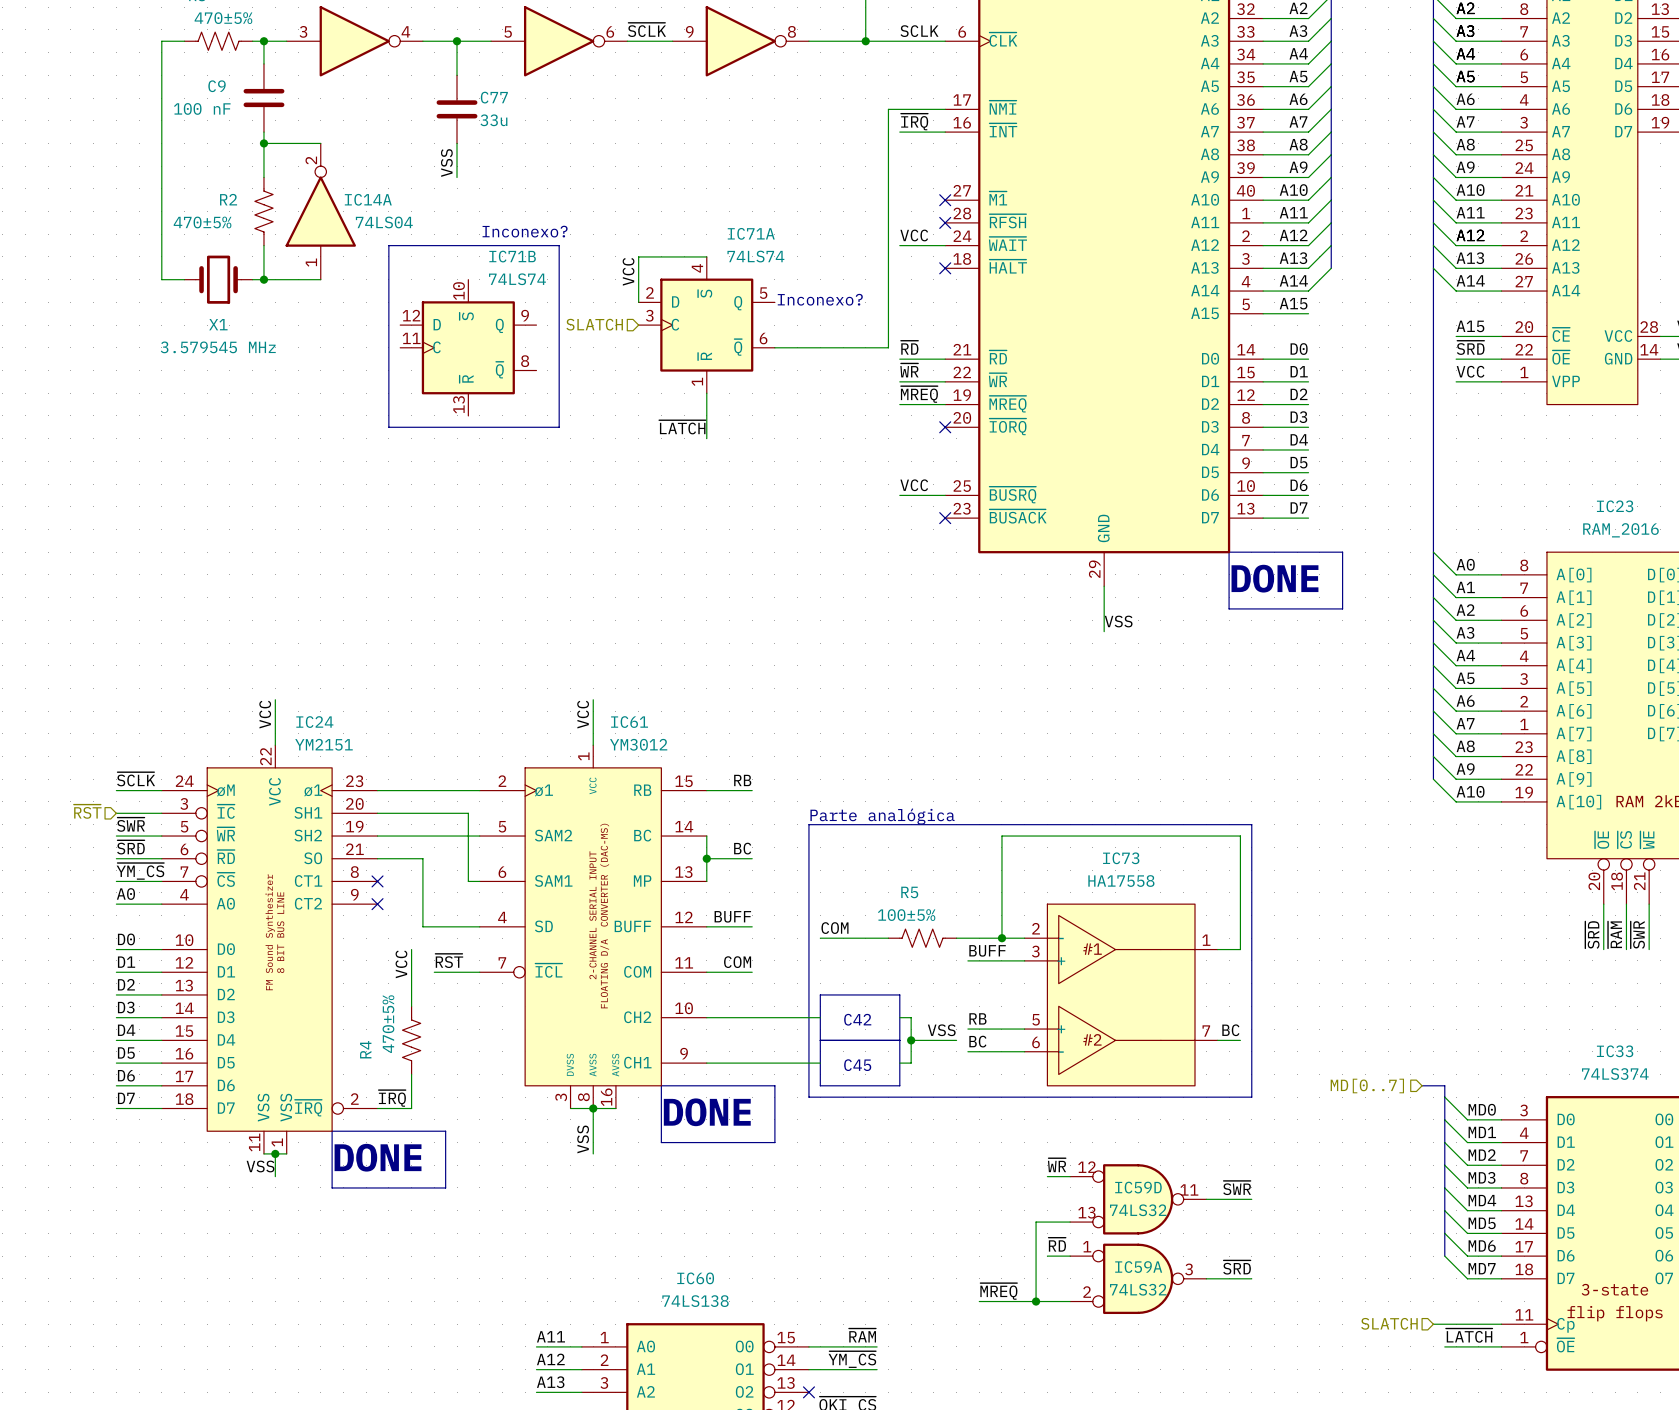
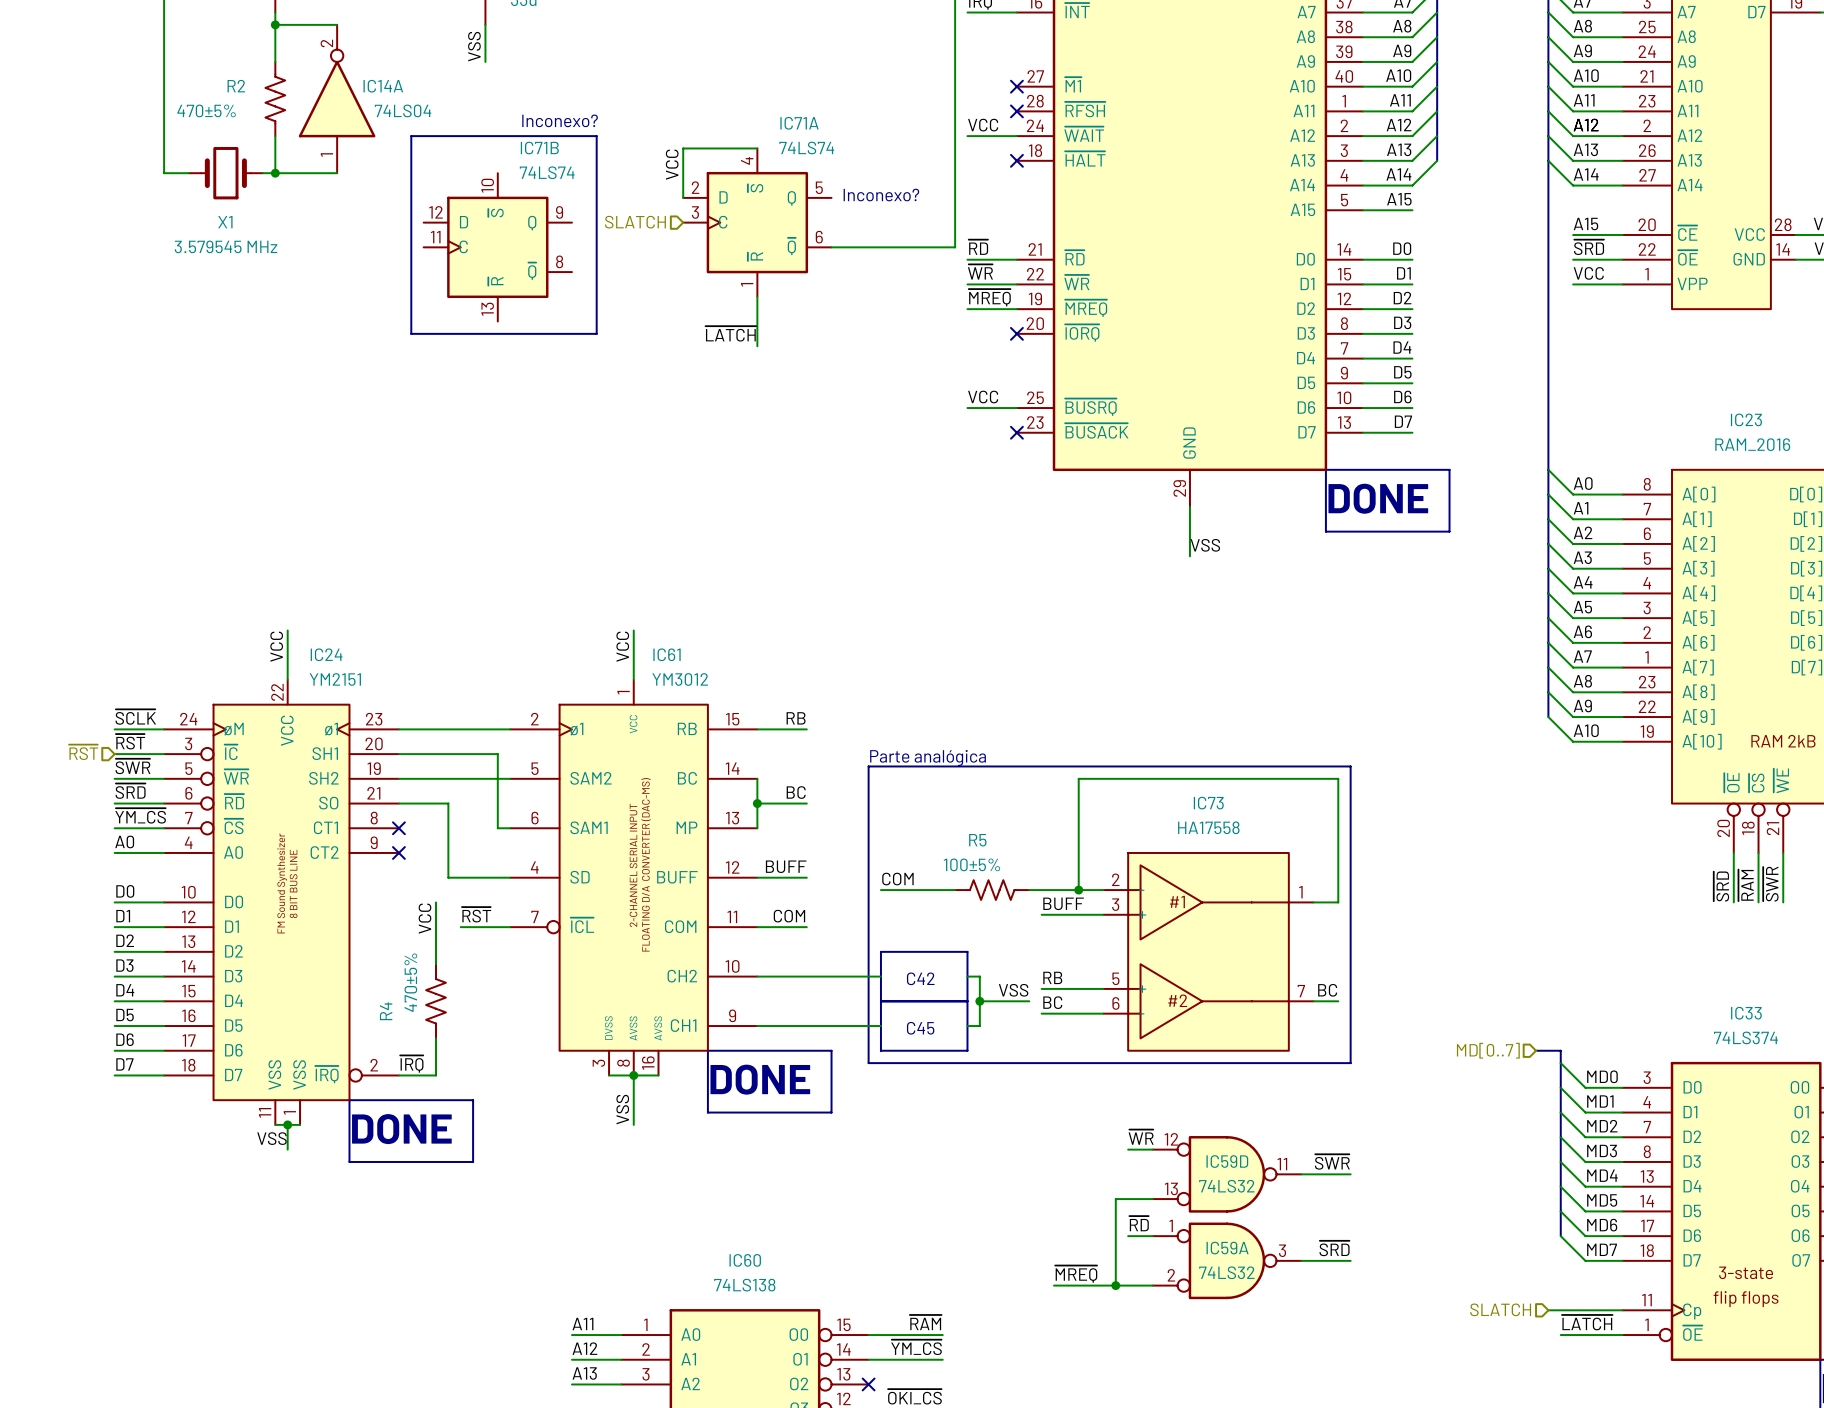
label: none -> ~{RST} (130, 741)

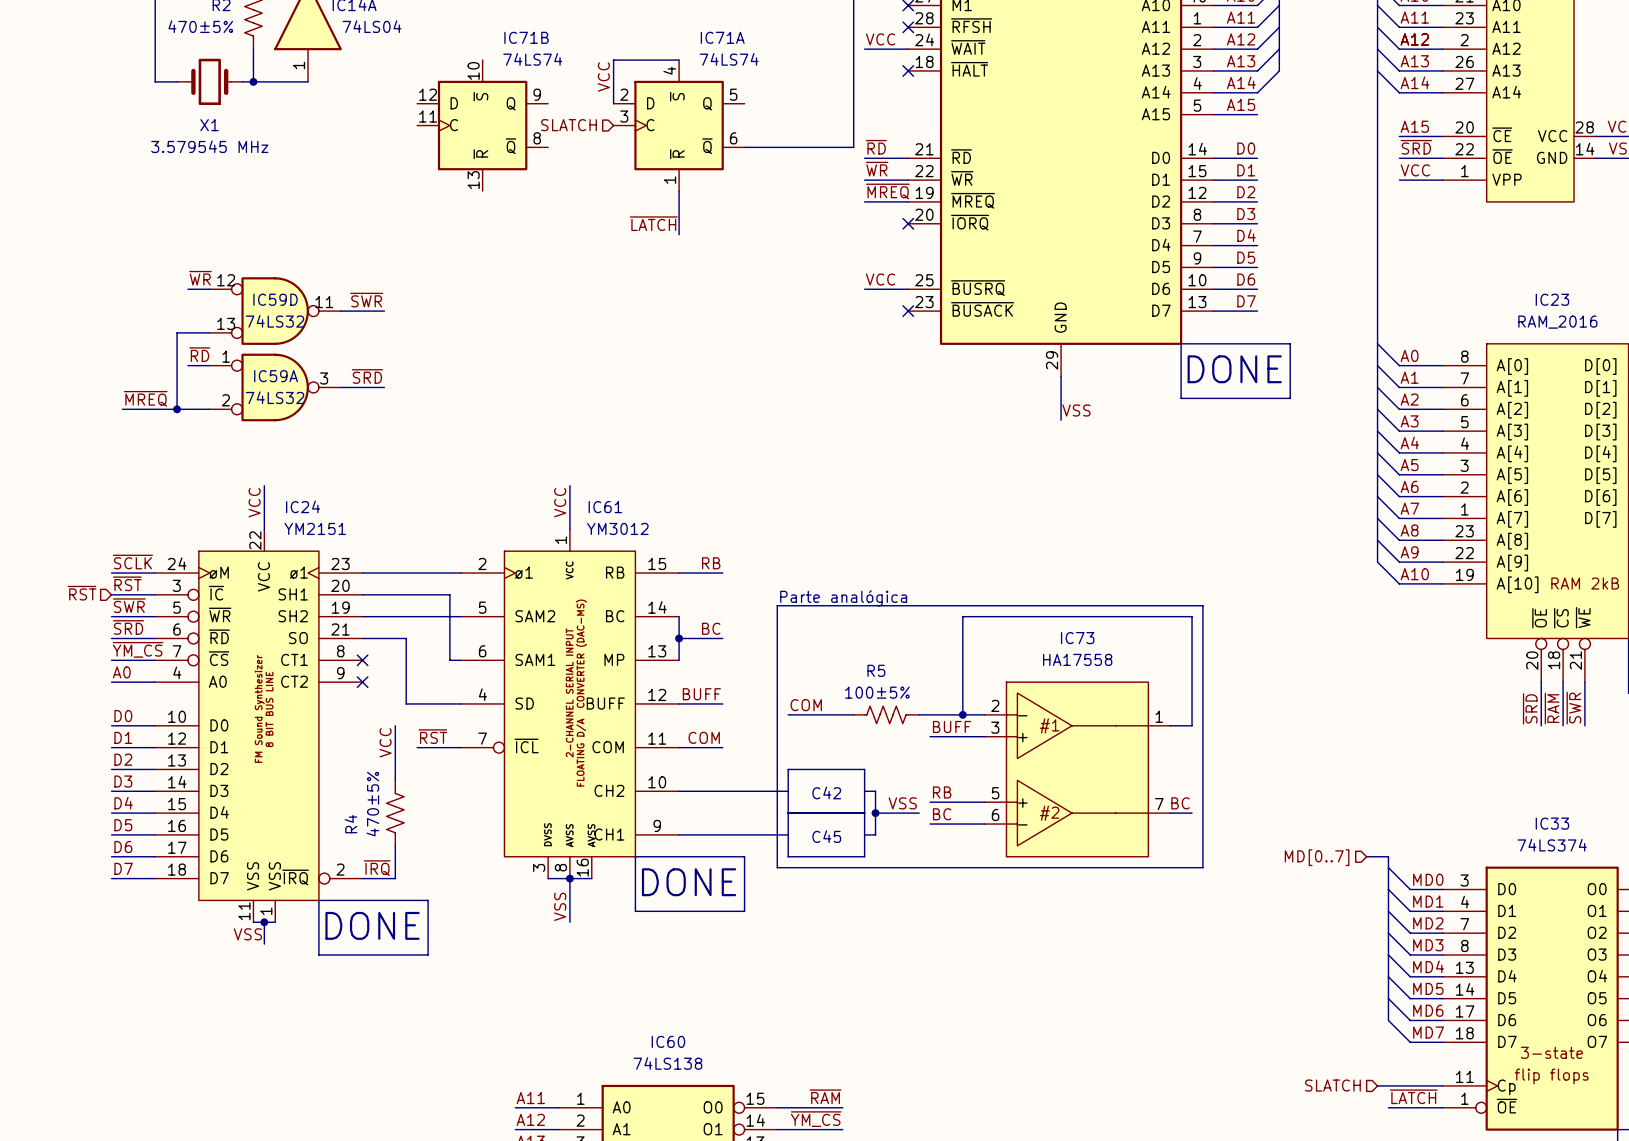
text: Inconexo? (560, 120) -> none
line: (411, 136) (596, 136) (596, 333) (411, 333) (411, 136) -> none
text: Inconexo? (881, 195) -> none
IC71B position: (497, 247) -> (482, 125)
label: none -> ~{WR} (200, 278)
wire: none -> (187, 289) (209, 289)
label: none -> ~{SWR} (366, 300)
wire: none -> (340, 311) (384, 311)
wire: none -> (209, 332) (177, 332) (177, 409)
label: none -> ~{RD} (199, 354)
wire: none -> (187, 365) (209, 365)
label: none -> ~{SRD} (367, 376)
wire: none -> (340, 387) (384, 387)
label: none -> ~{MREQ} (145, 398)
wire: none -> (122, 409) (209, 409)
junction: none -> (177, 409)
label: ~{WR} (1141, 1137) -> none
wire: (1128, 1149) (1152, 1149) -> none
label: ~{SWR} (1332, 1161) -> none
IC59D position: (1227, 1174) -> (275, 311)
wire: (1301, 1174) (1350, 1174) -> none
wire: (1152, 1199) (1115, 1199) (1115, 1285) -> none
label: ~{RD} (1139, 1223) -> none
wire: (1128, 1236) (1152, 1236) -> none
label: ~{SRD} (1334, 1248) -> none
IC59A position: (1227, 1260) -> (275, 387)
wire: (1301, 1260) (1350, 1260) -> none
label: ~{MREQ} (1076, 1274) -> none
wire: (1054, 1285) (1152, 1285) -> none
junction: (1115, 1285) -> none

